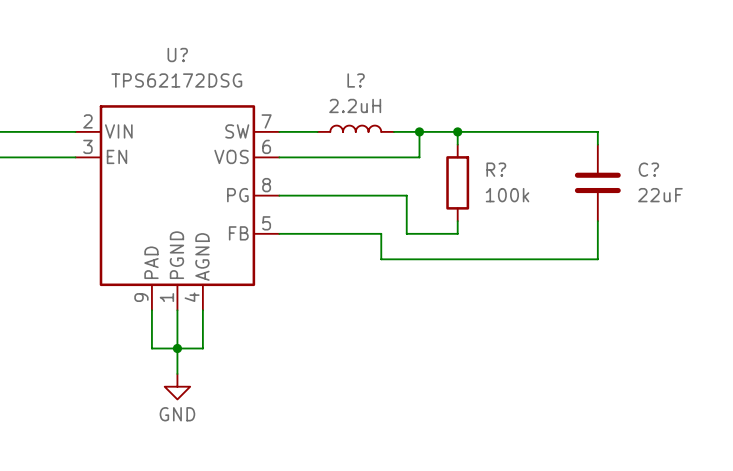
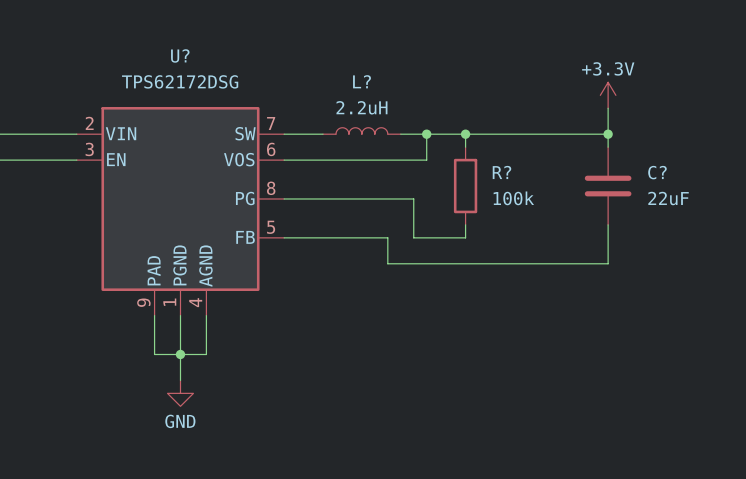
power symbol: none -> +3.3V (608, 95)
wire: none -> (608, 108) (608, 134)
junction: none -> (608, 134)

